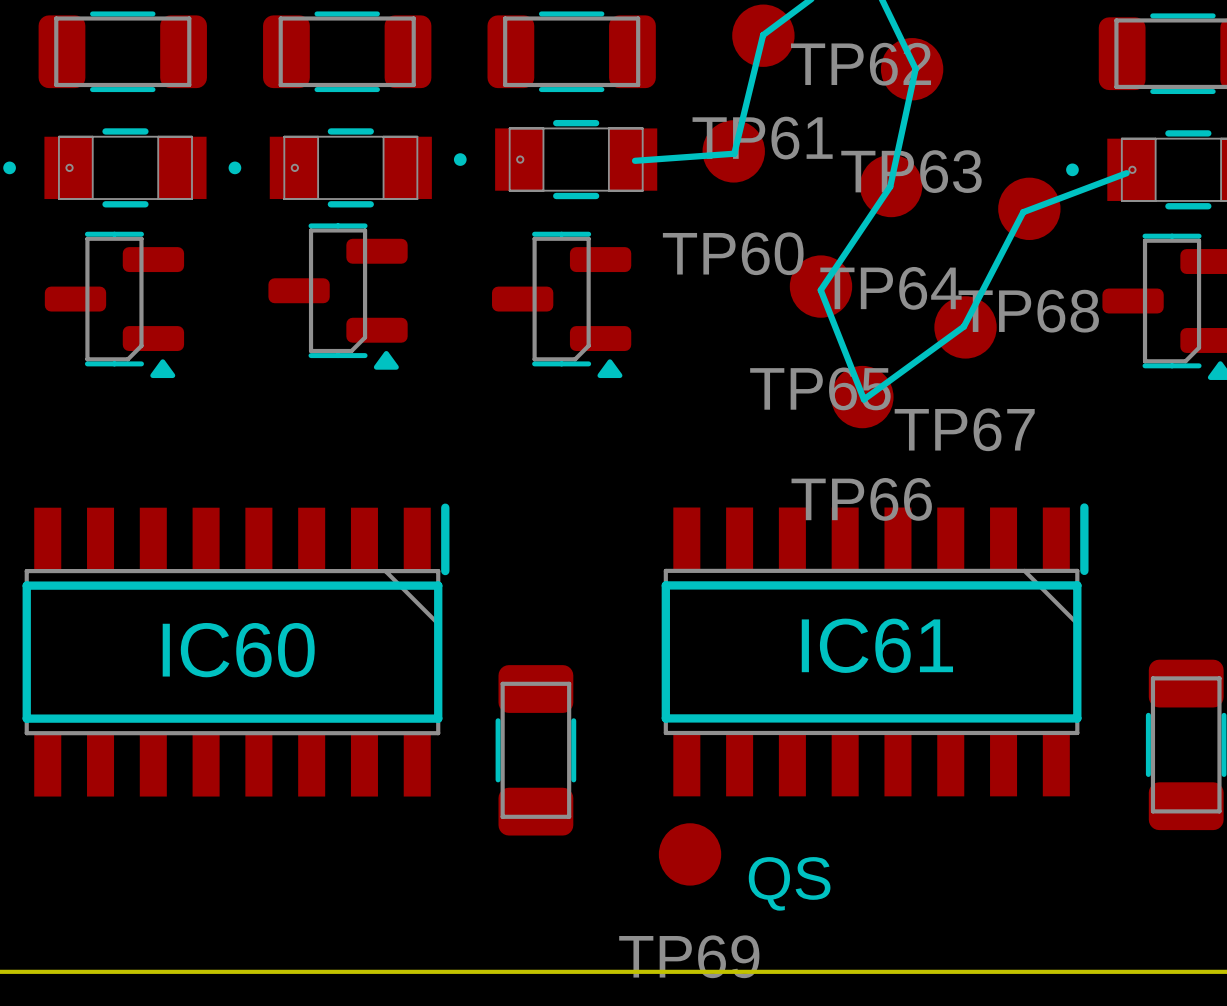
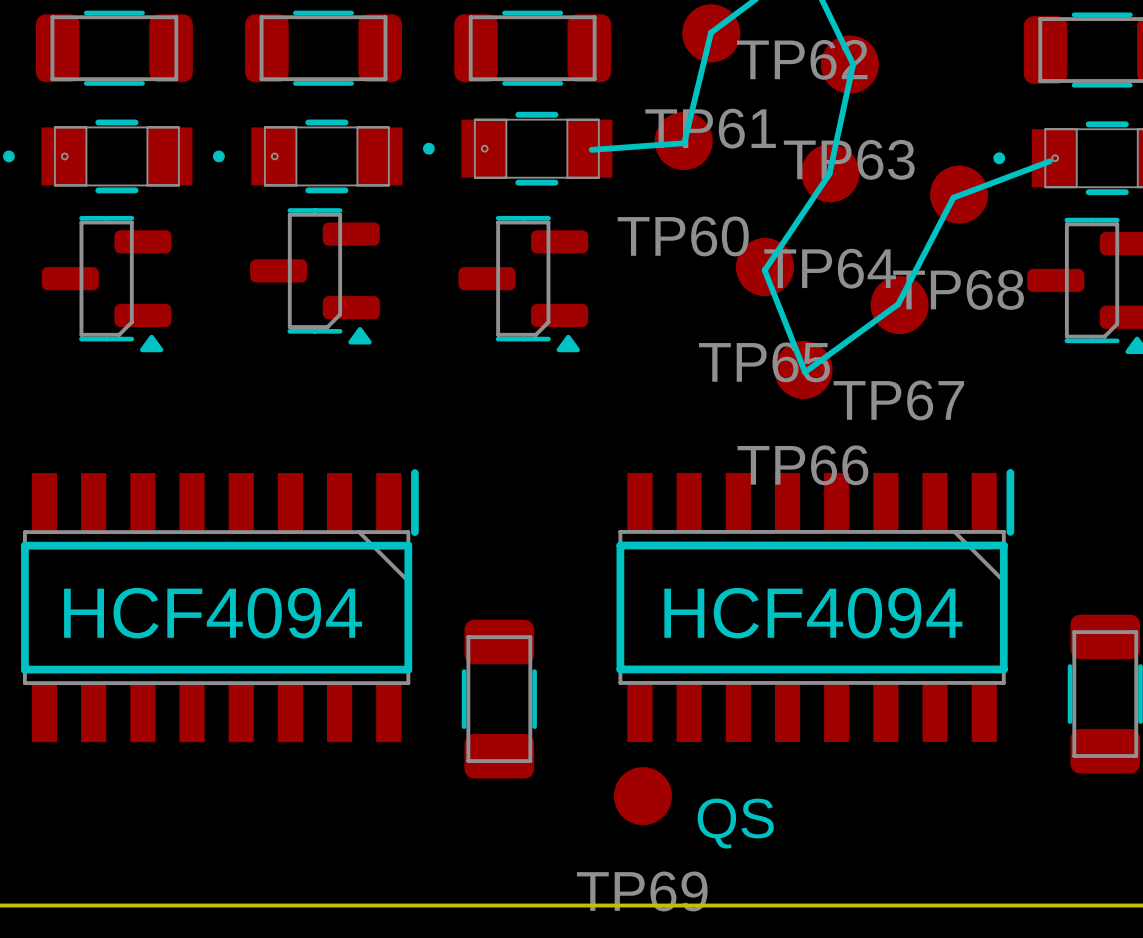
IC61 name: IC61 (877, 645) -> none
IC60 name: IC60 (238, 650) -> none
text: none -> HCF4094 (213, 613)
text: none -> HCF4094 (813, 613)

